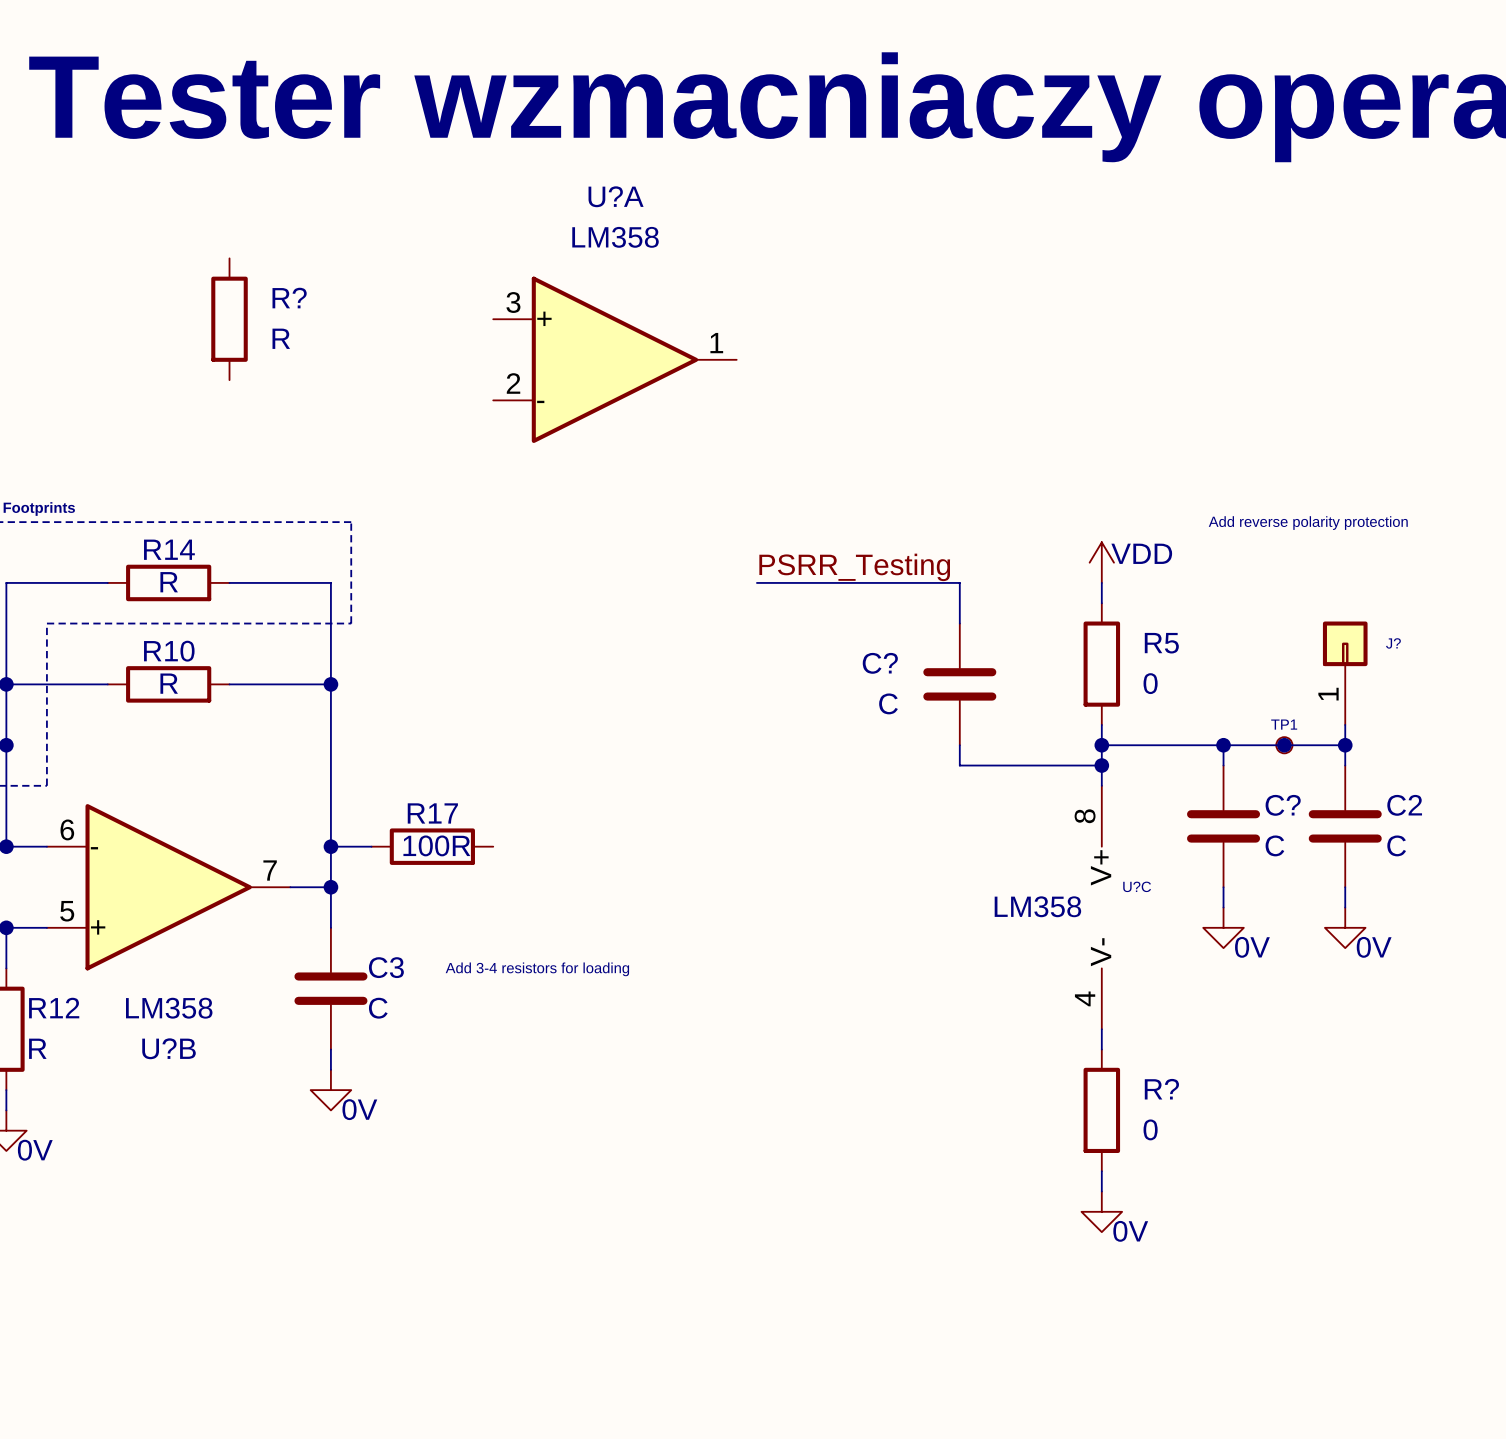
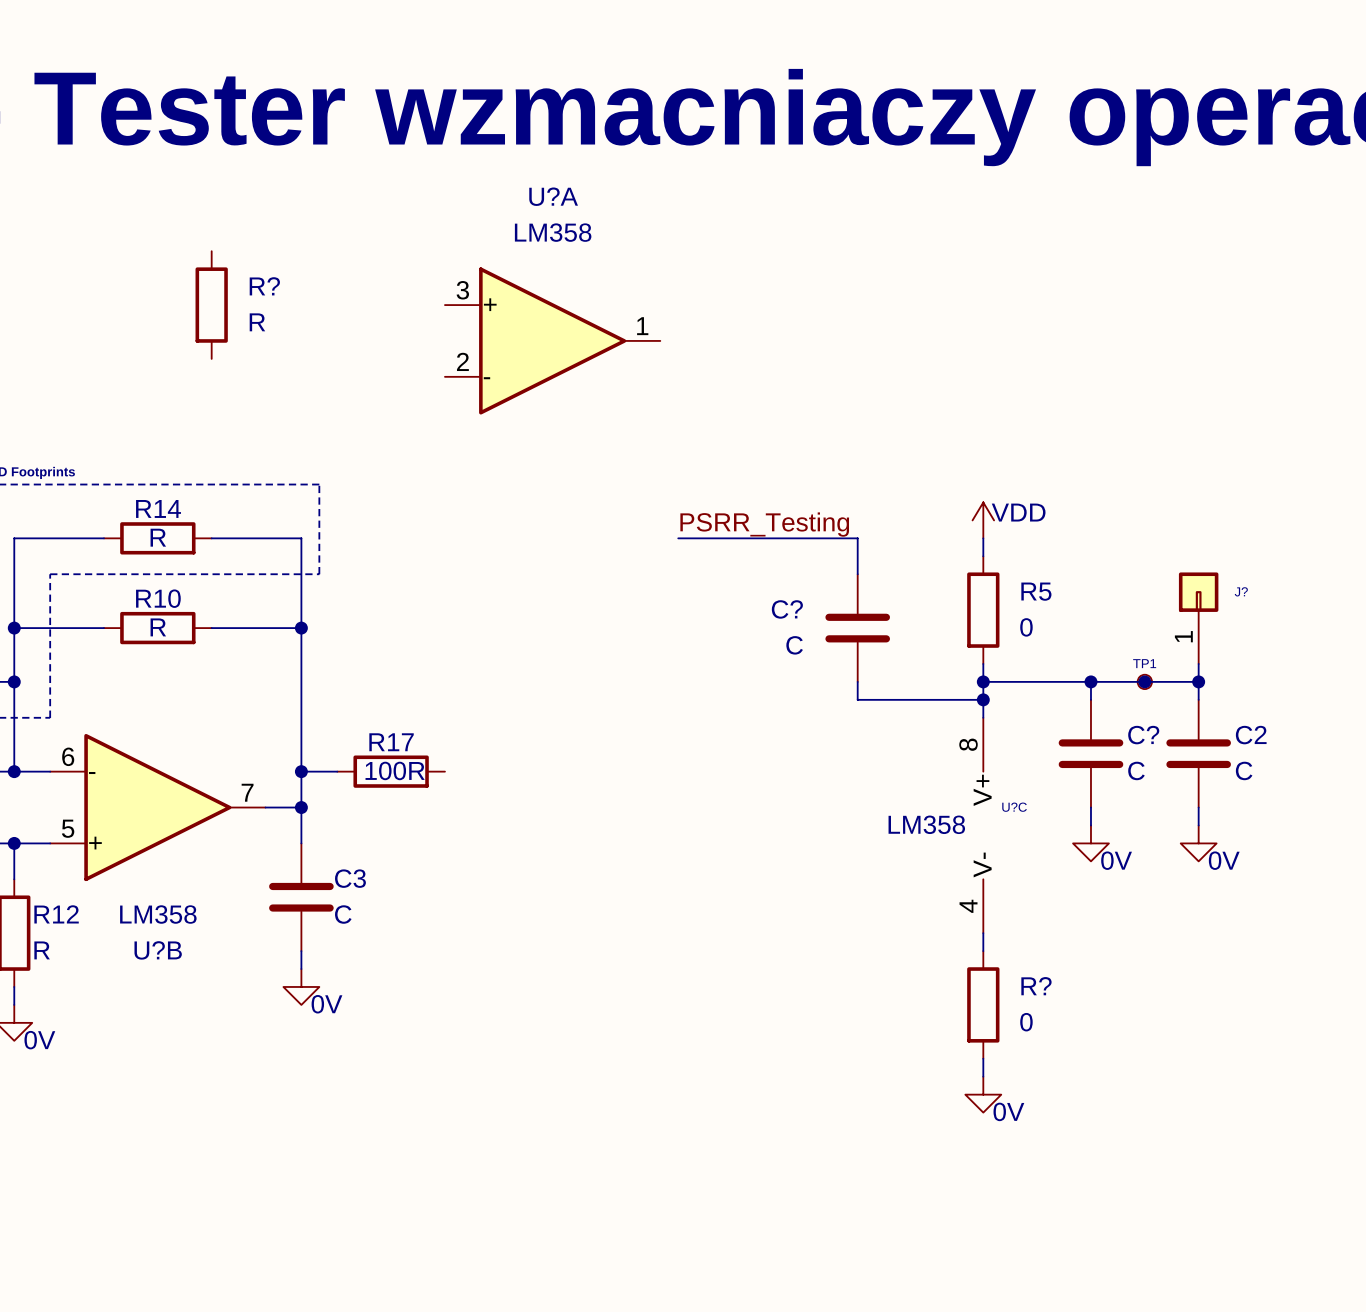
text: Add reverse polarity protection (1308, 523) -> none
text: Add 3-4 resistors for loading (537, 969) -> none

